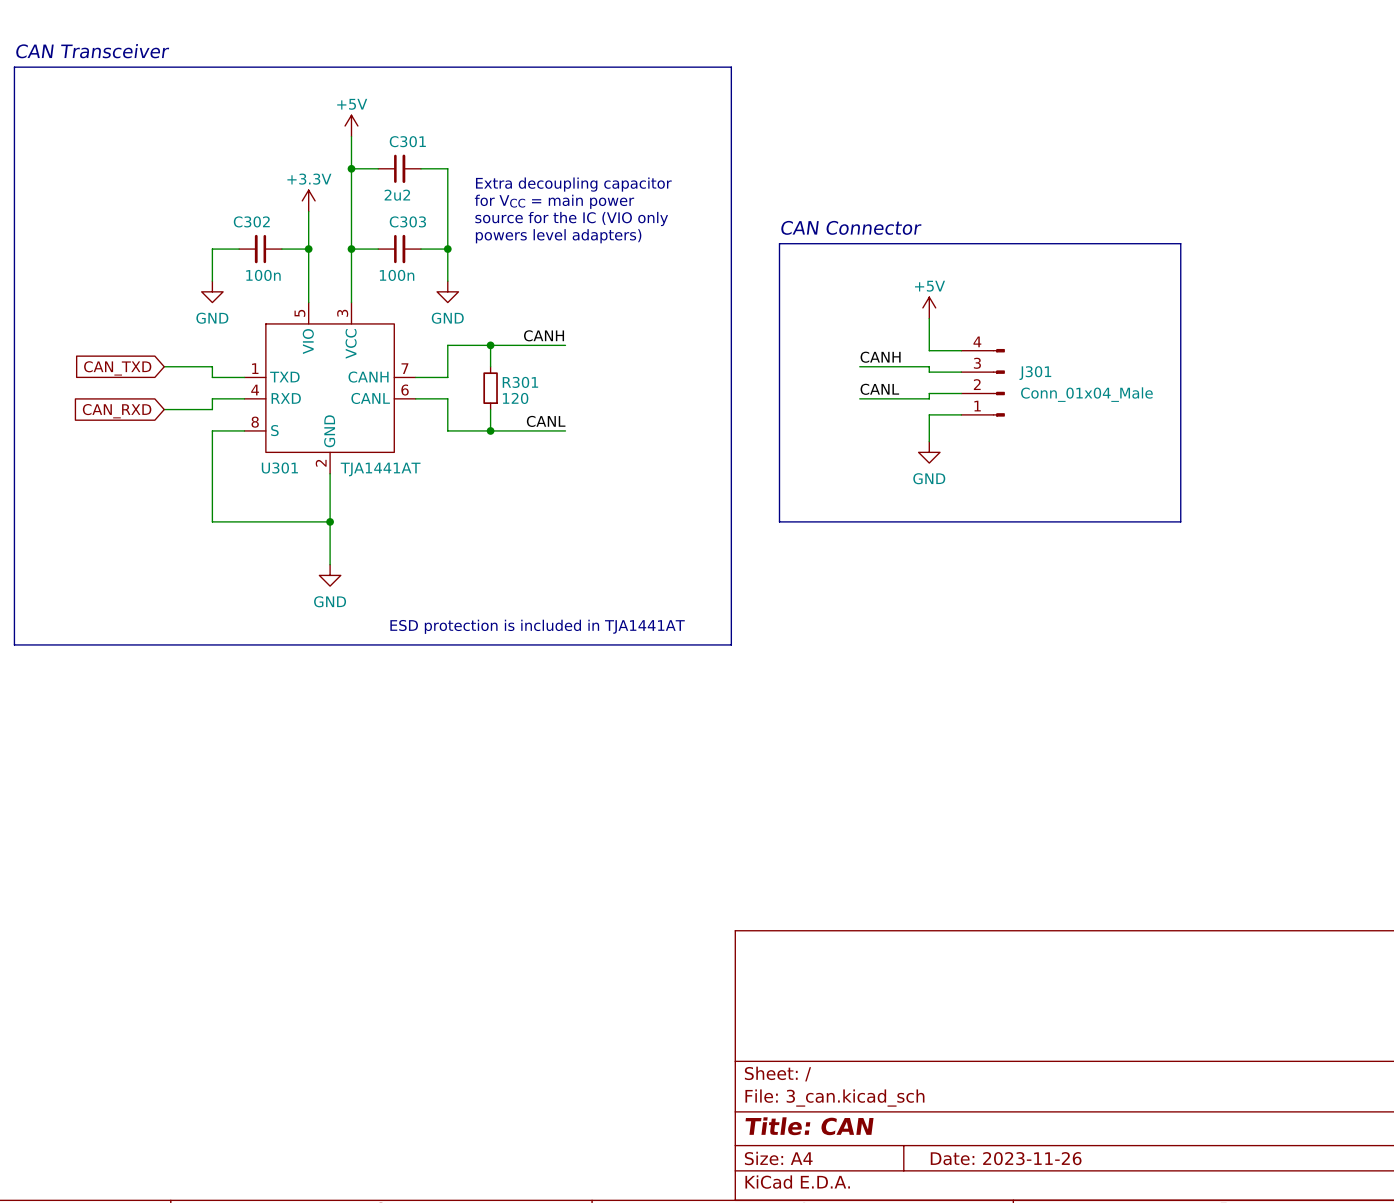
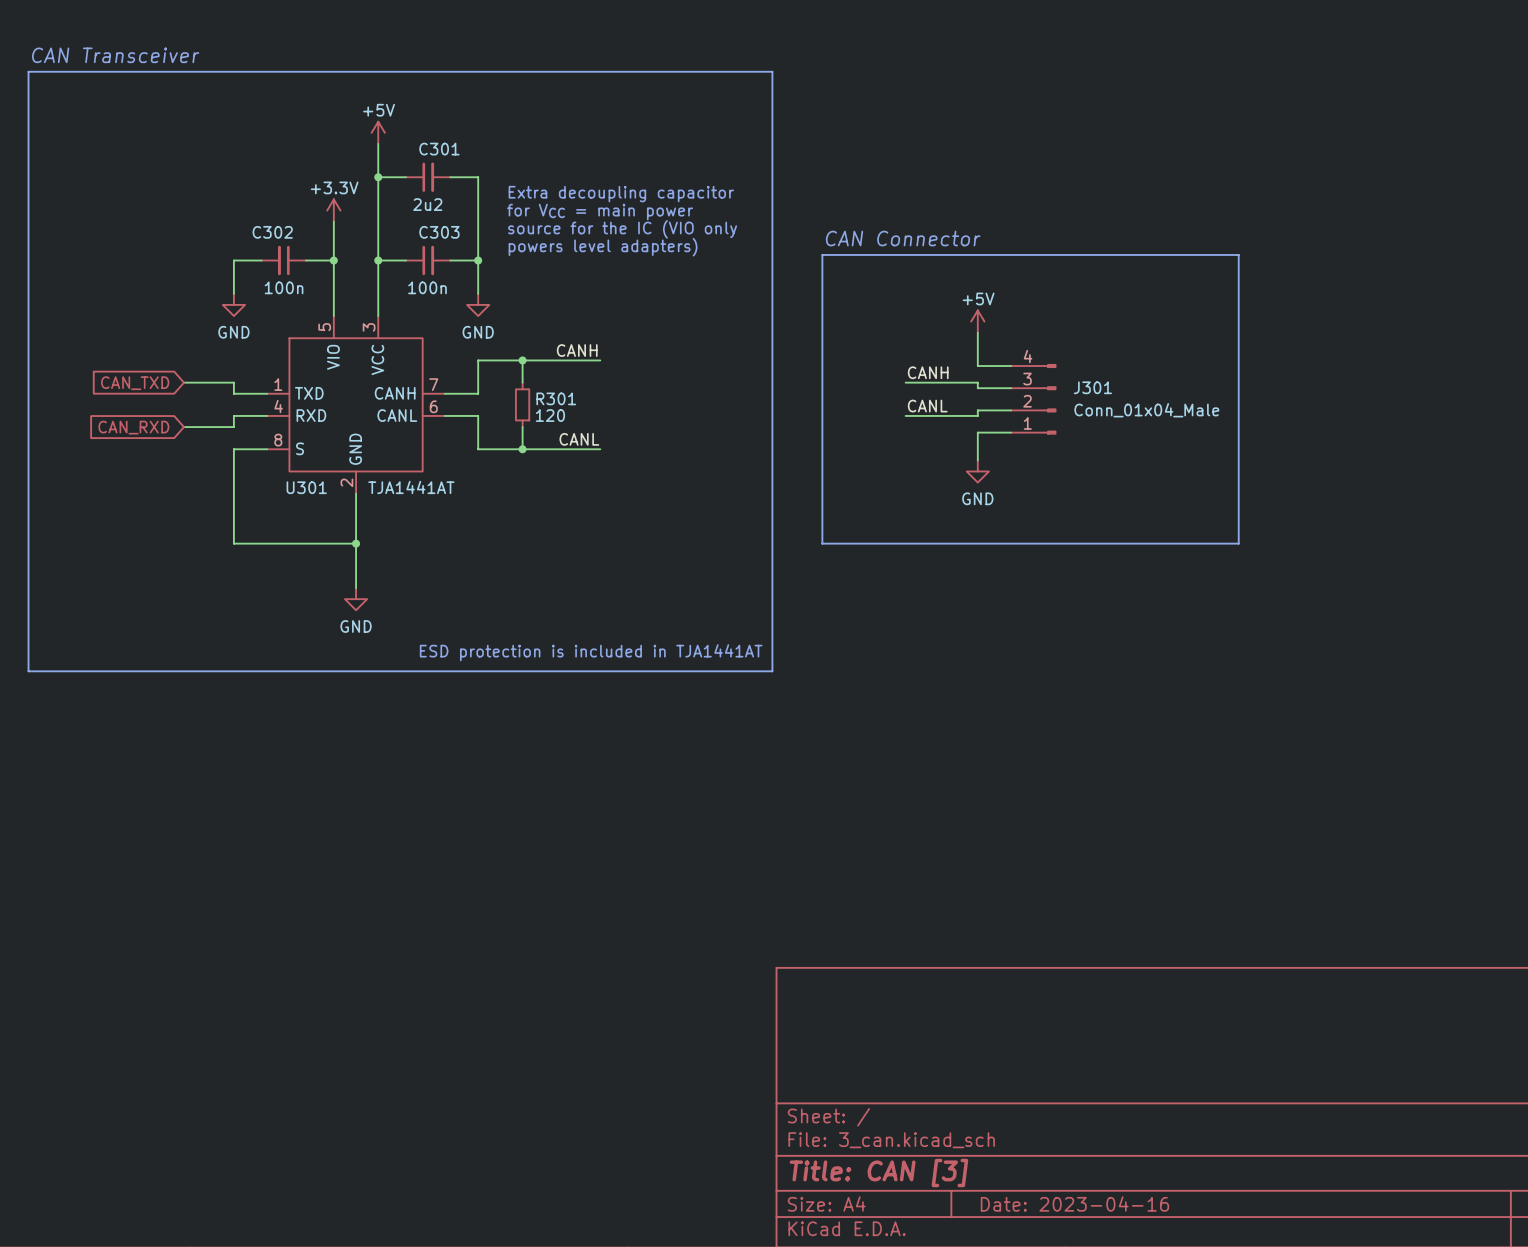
title block: Title: CAN (809, 1126) -> Title: CAN [3] (878, 1173)
title block: Date: 2023-11-26 (1006, 1158) -> Date: 2023-04-16 (1074, 1203)

